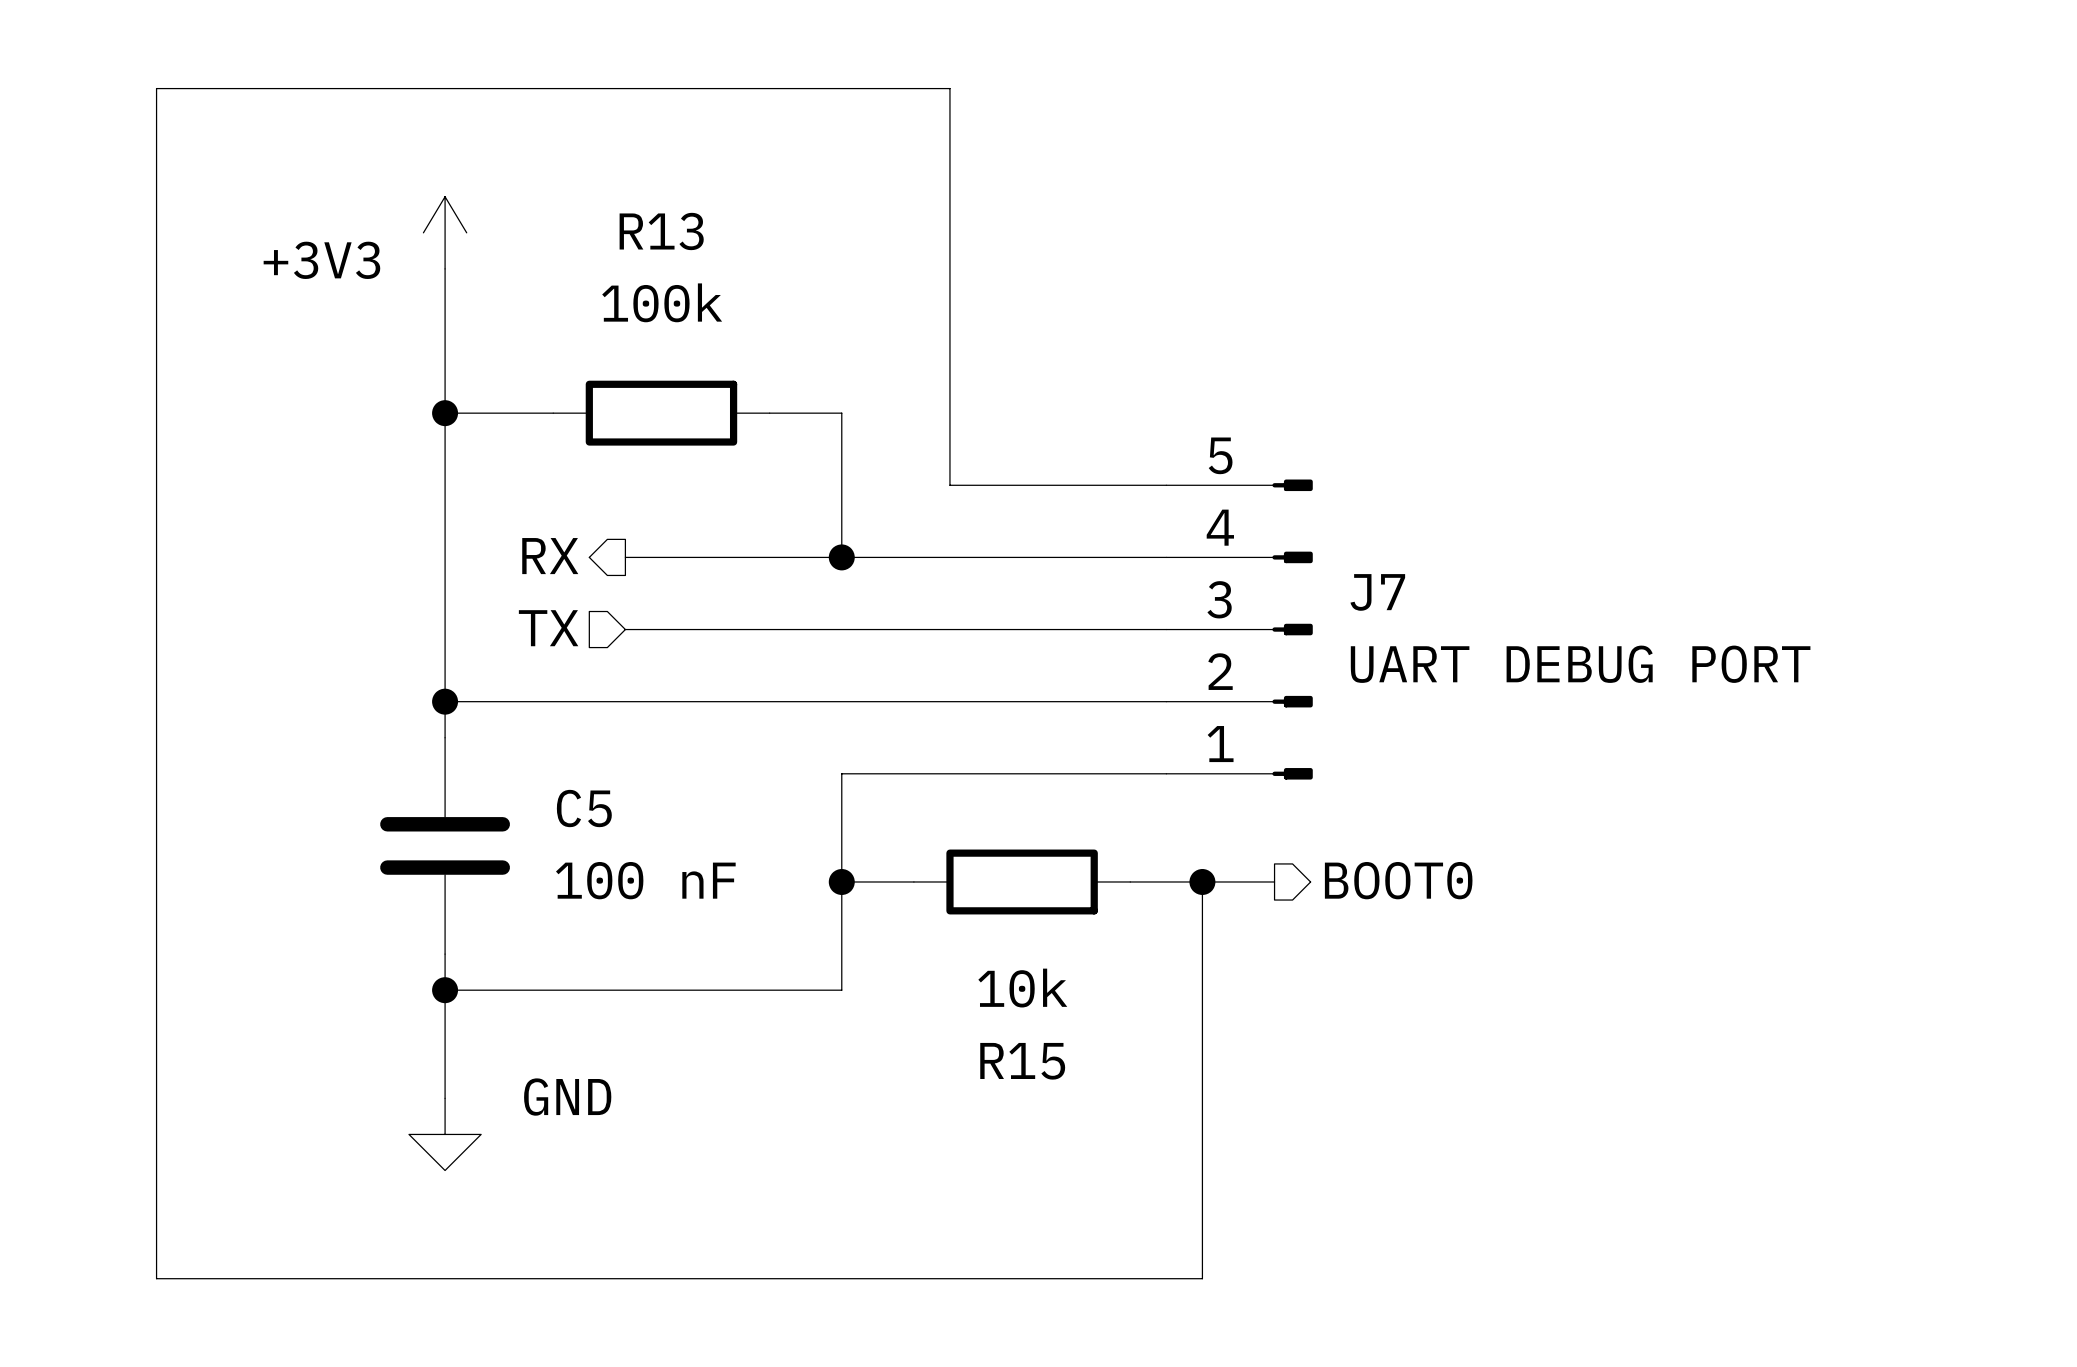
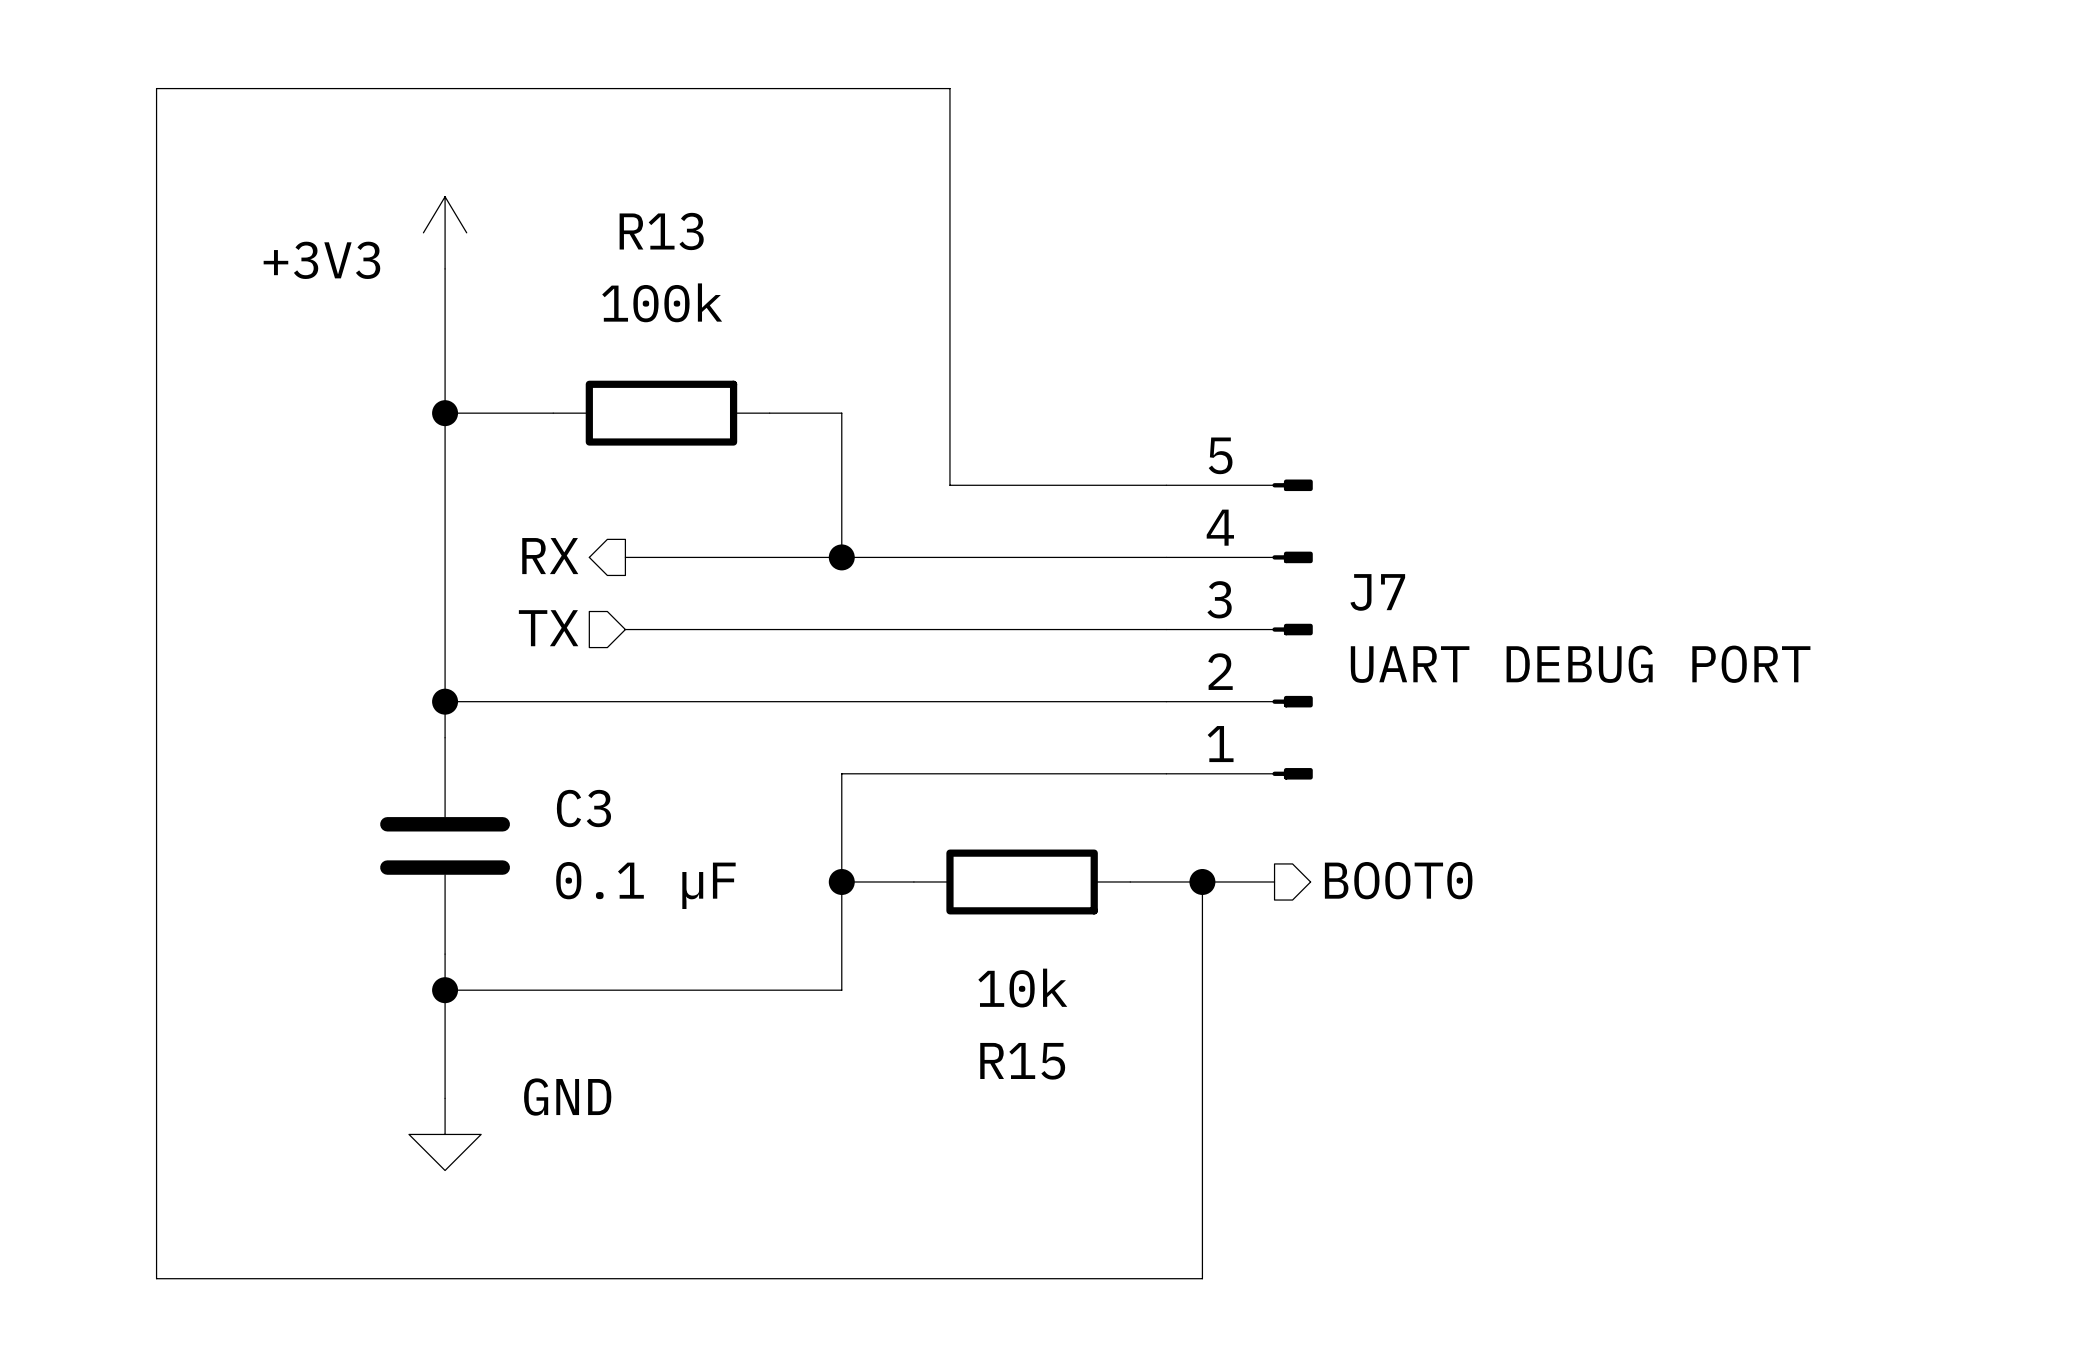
C5 name: C5 (584, 808) -> C3 (583, 808)
C5 value: 100 nF (645, 880) -> 0.1 µF (645, 885)

